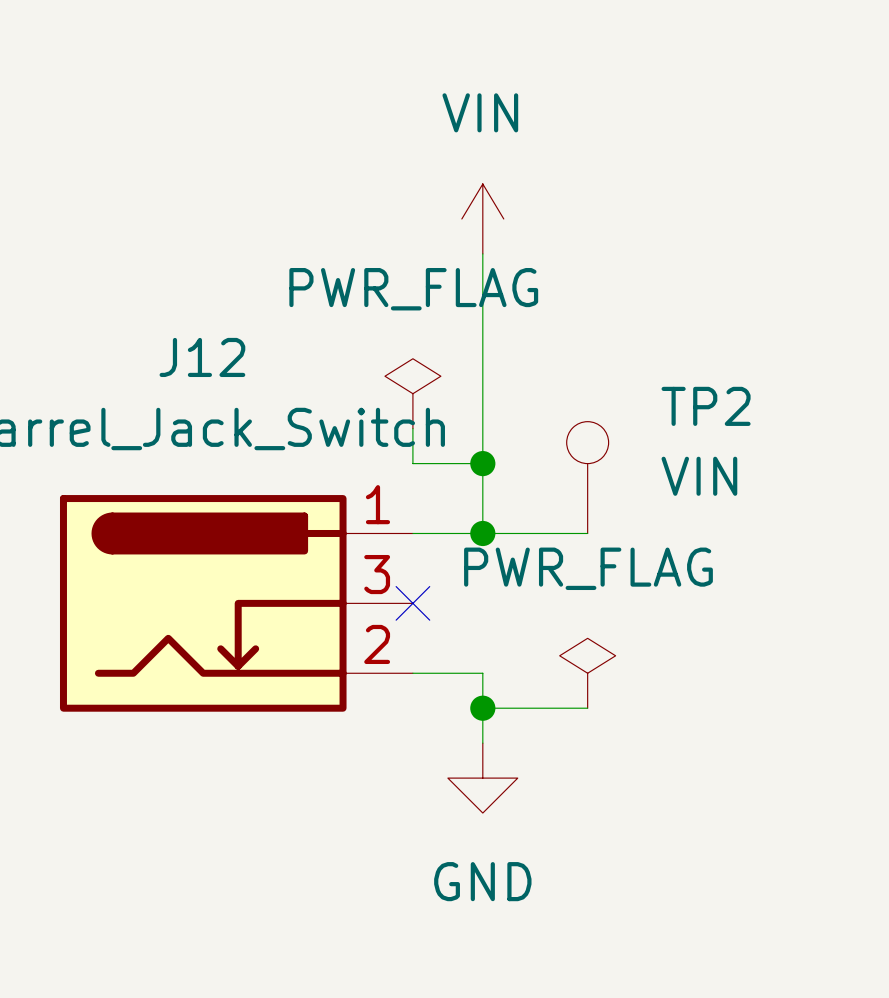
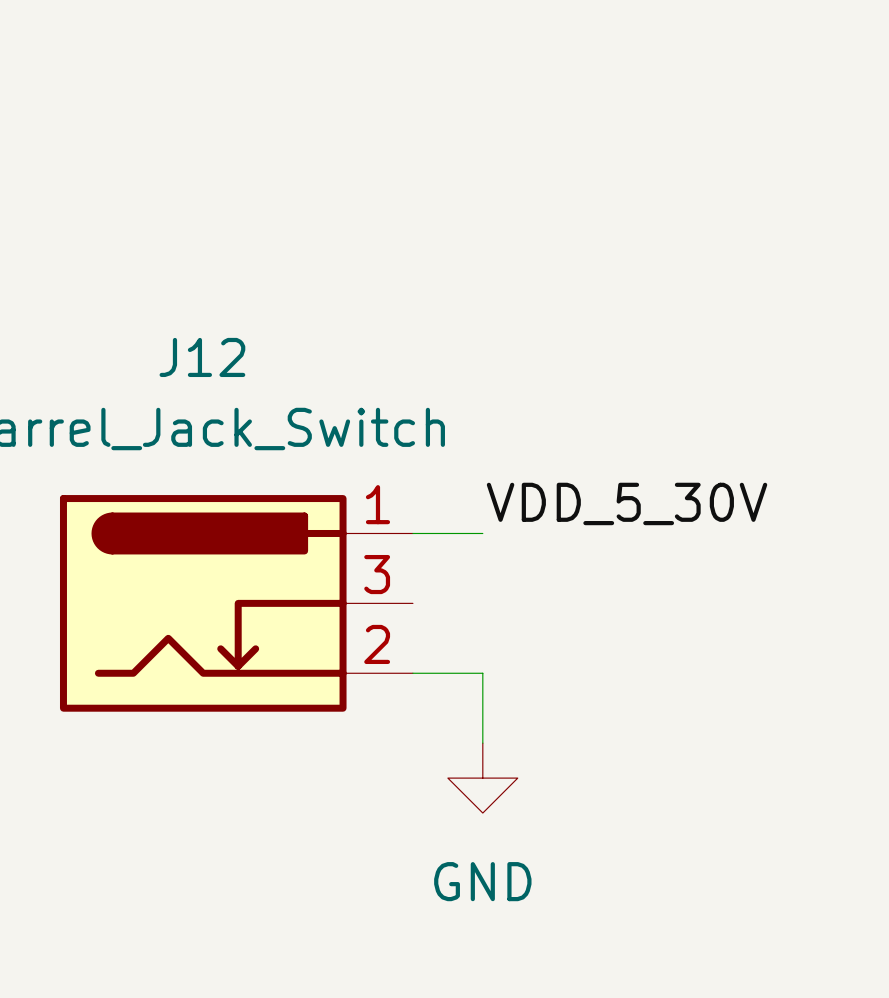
power symbol: VIN (482, 218) -> none
wire: (482, 253) (482, 533) (587, 533) -> none
power symbol: PWR_FLAG (412, 393) -> none
wire: (412, 428) (412, 463) (482, 463) -> none
junction: (482, 463) -> none
TP2: VIN (587, 477) -> none
label: none -> VDD_5_30V (627, 503)
junction: (482, 533) -> none
no-connect mark: (412, 603) -> none
power symbol: PWR_FLAG (587, 673) -> none
wire: (482, 708) (587, 708) -> none
junction: (482, 708) -> none

